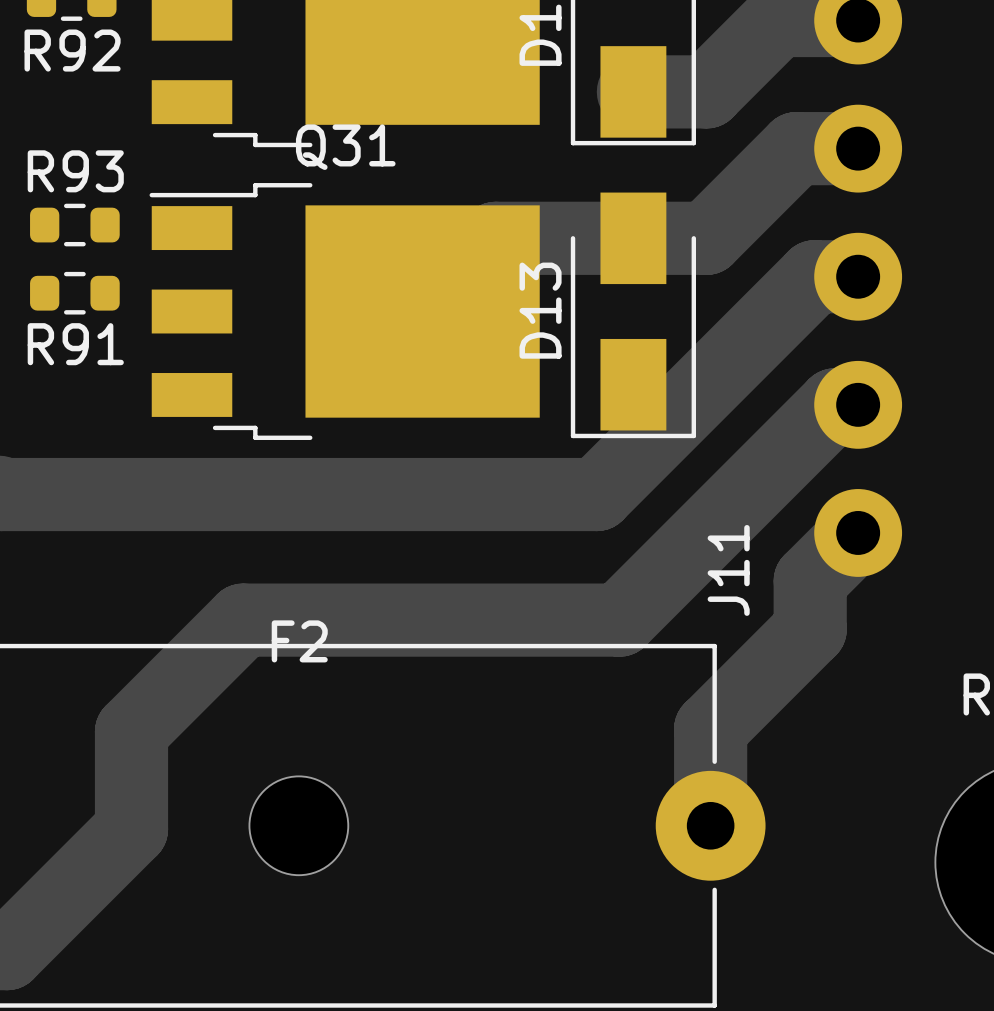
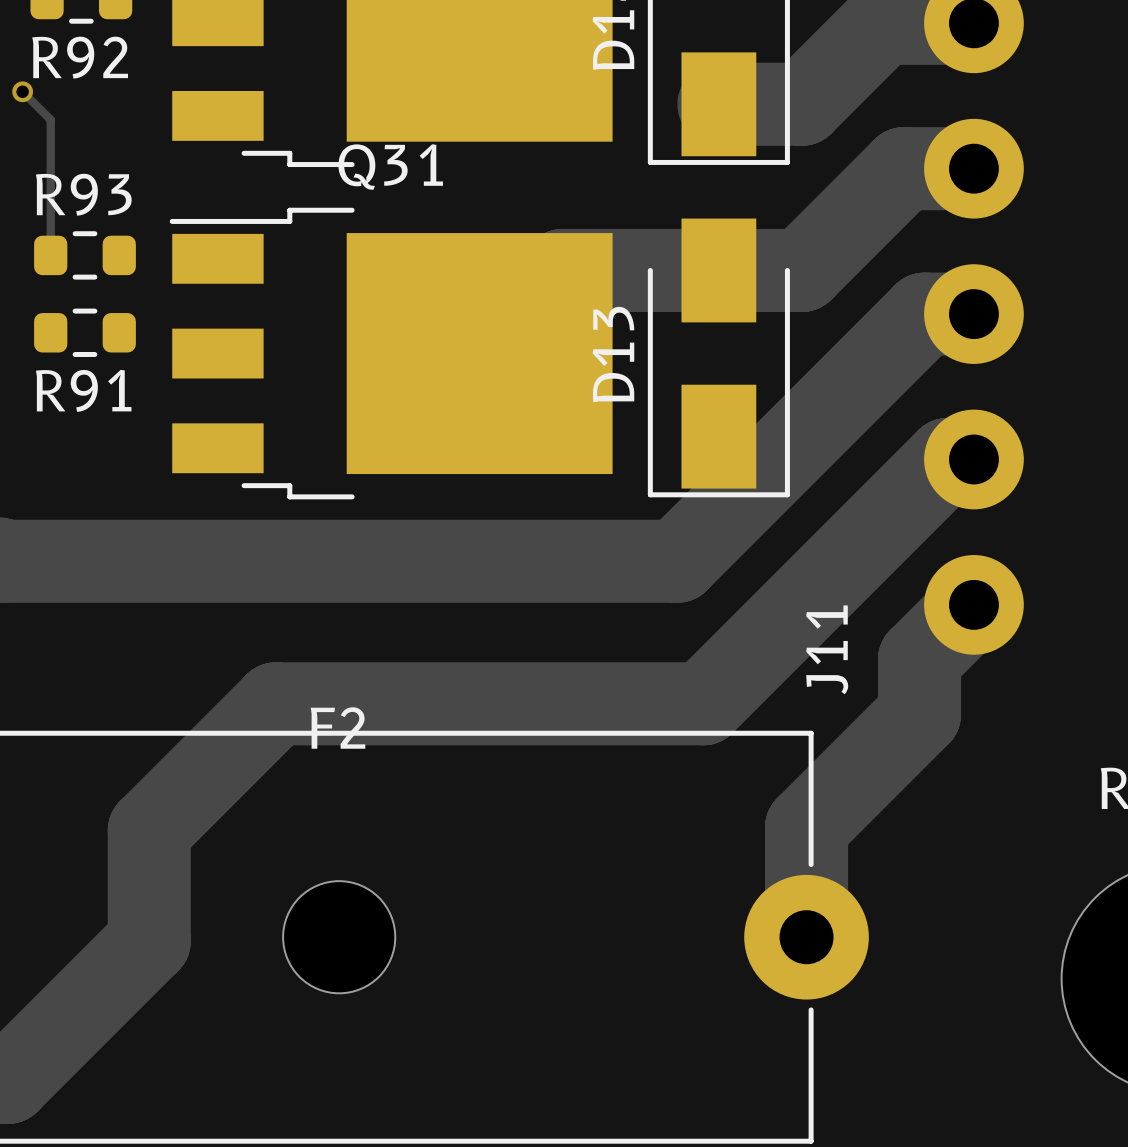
track: none -> (22, 91) (50, 119) (50, 255)
via: none -> (22, 91)

